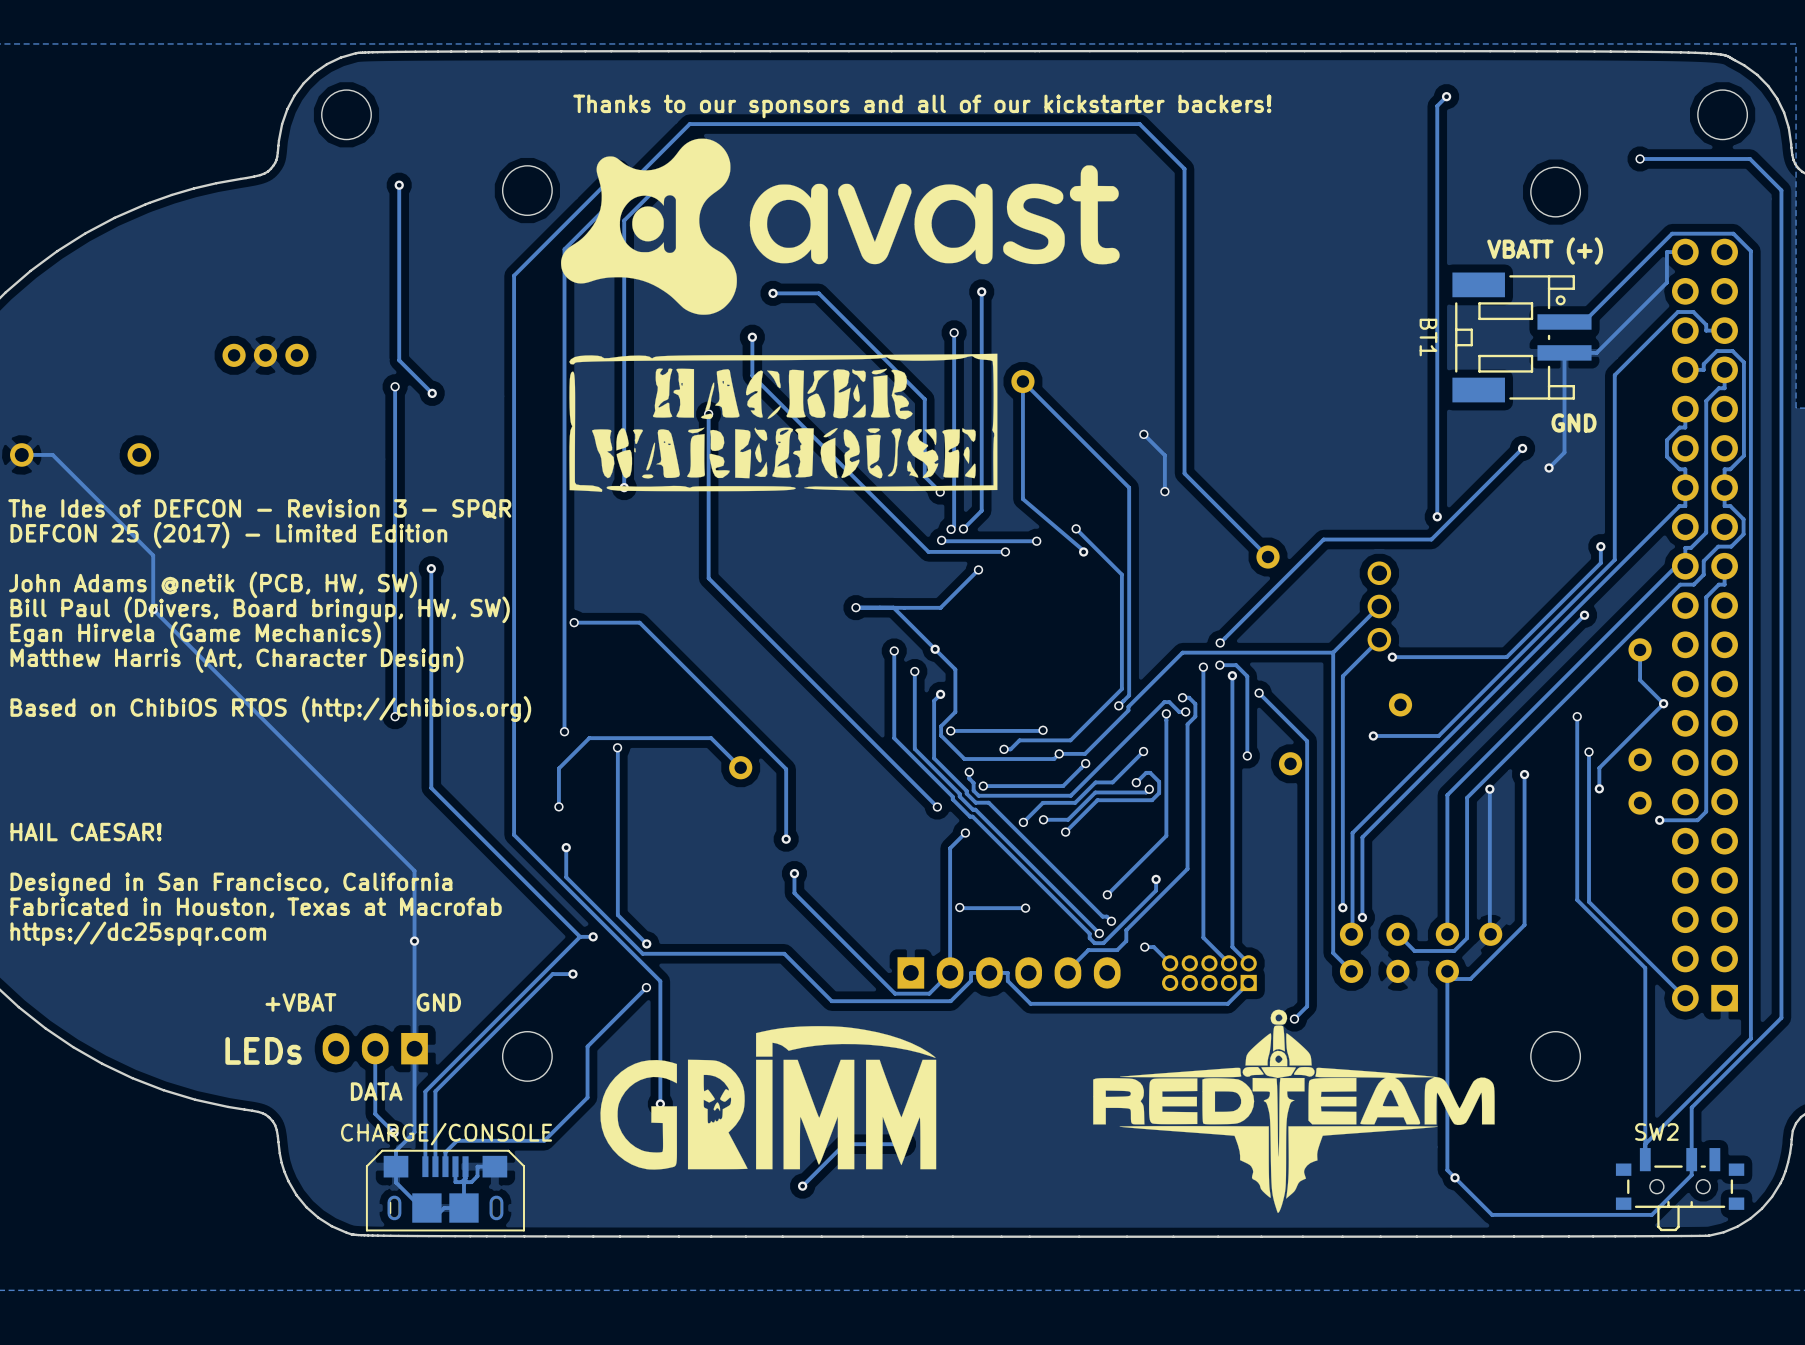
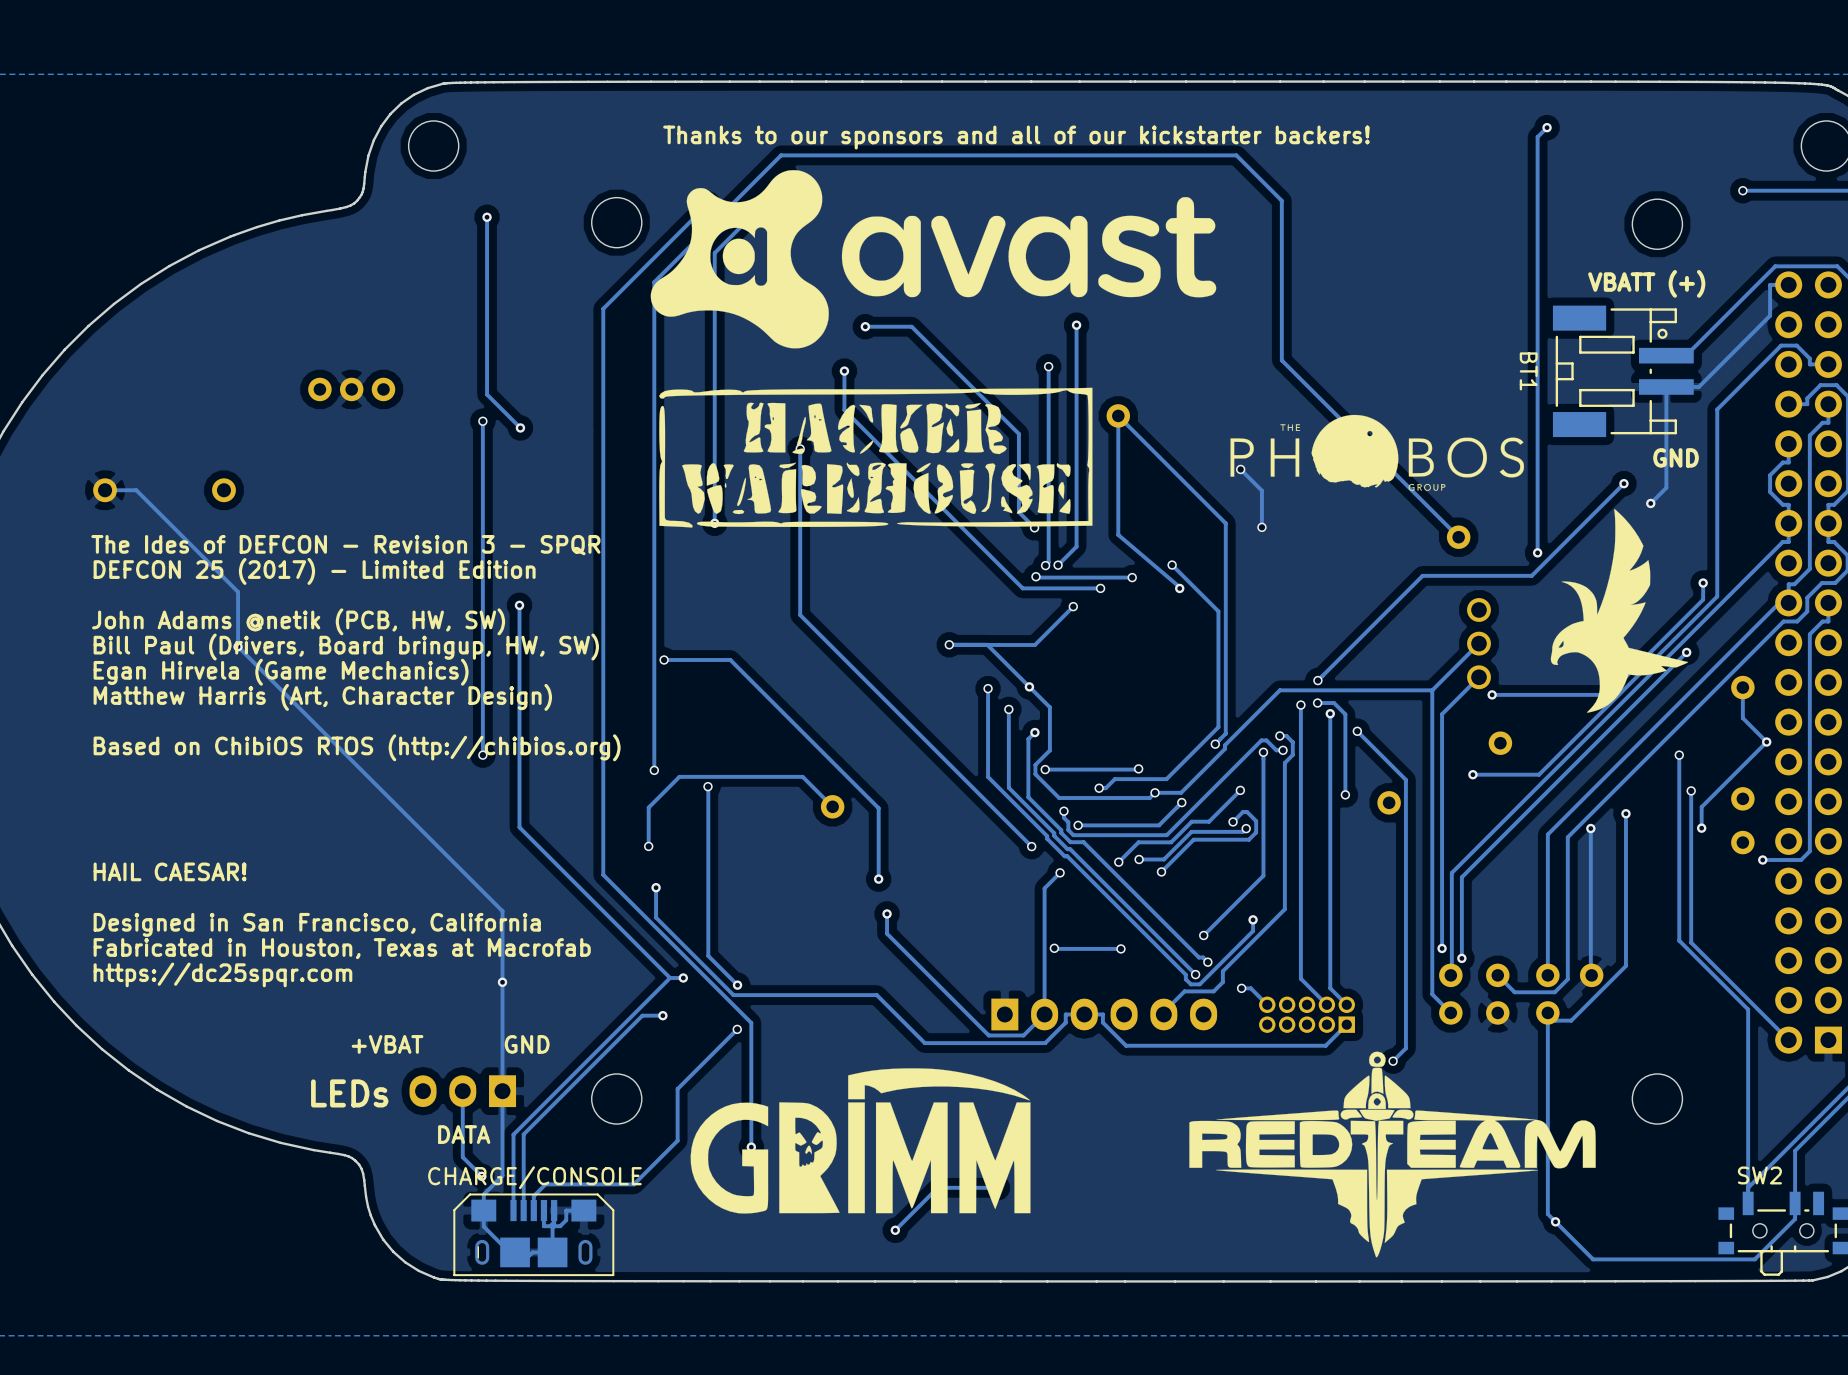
track: (1184, 326) (1184, 473) (1268, 557) -> (1281, 360) (1458, 537)
drawing: none -> [1230, 414, 1524, 491]
drawing: none -> [1550, 508, 1689, 713]
part position: (1268, 557) -> (1458, 537)

